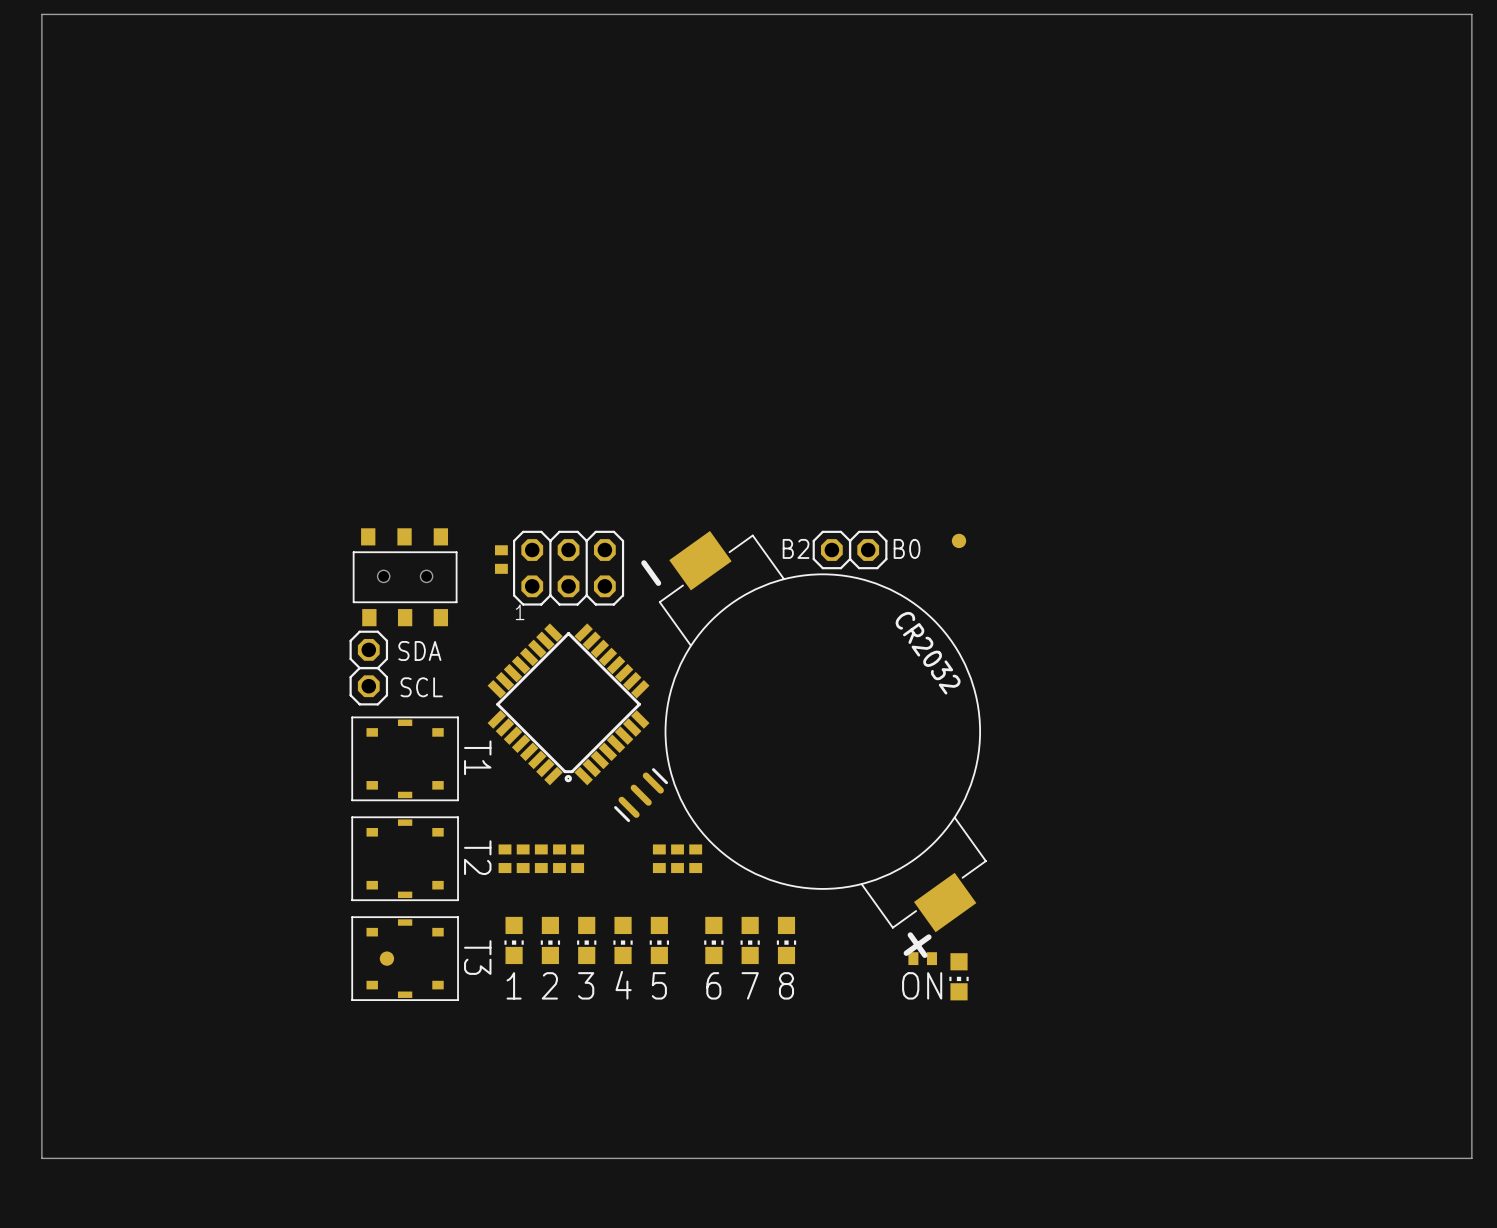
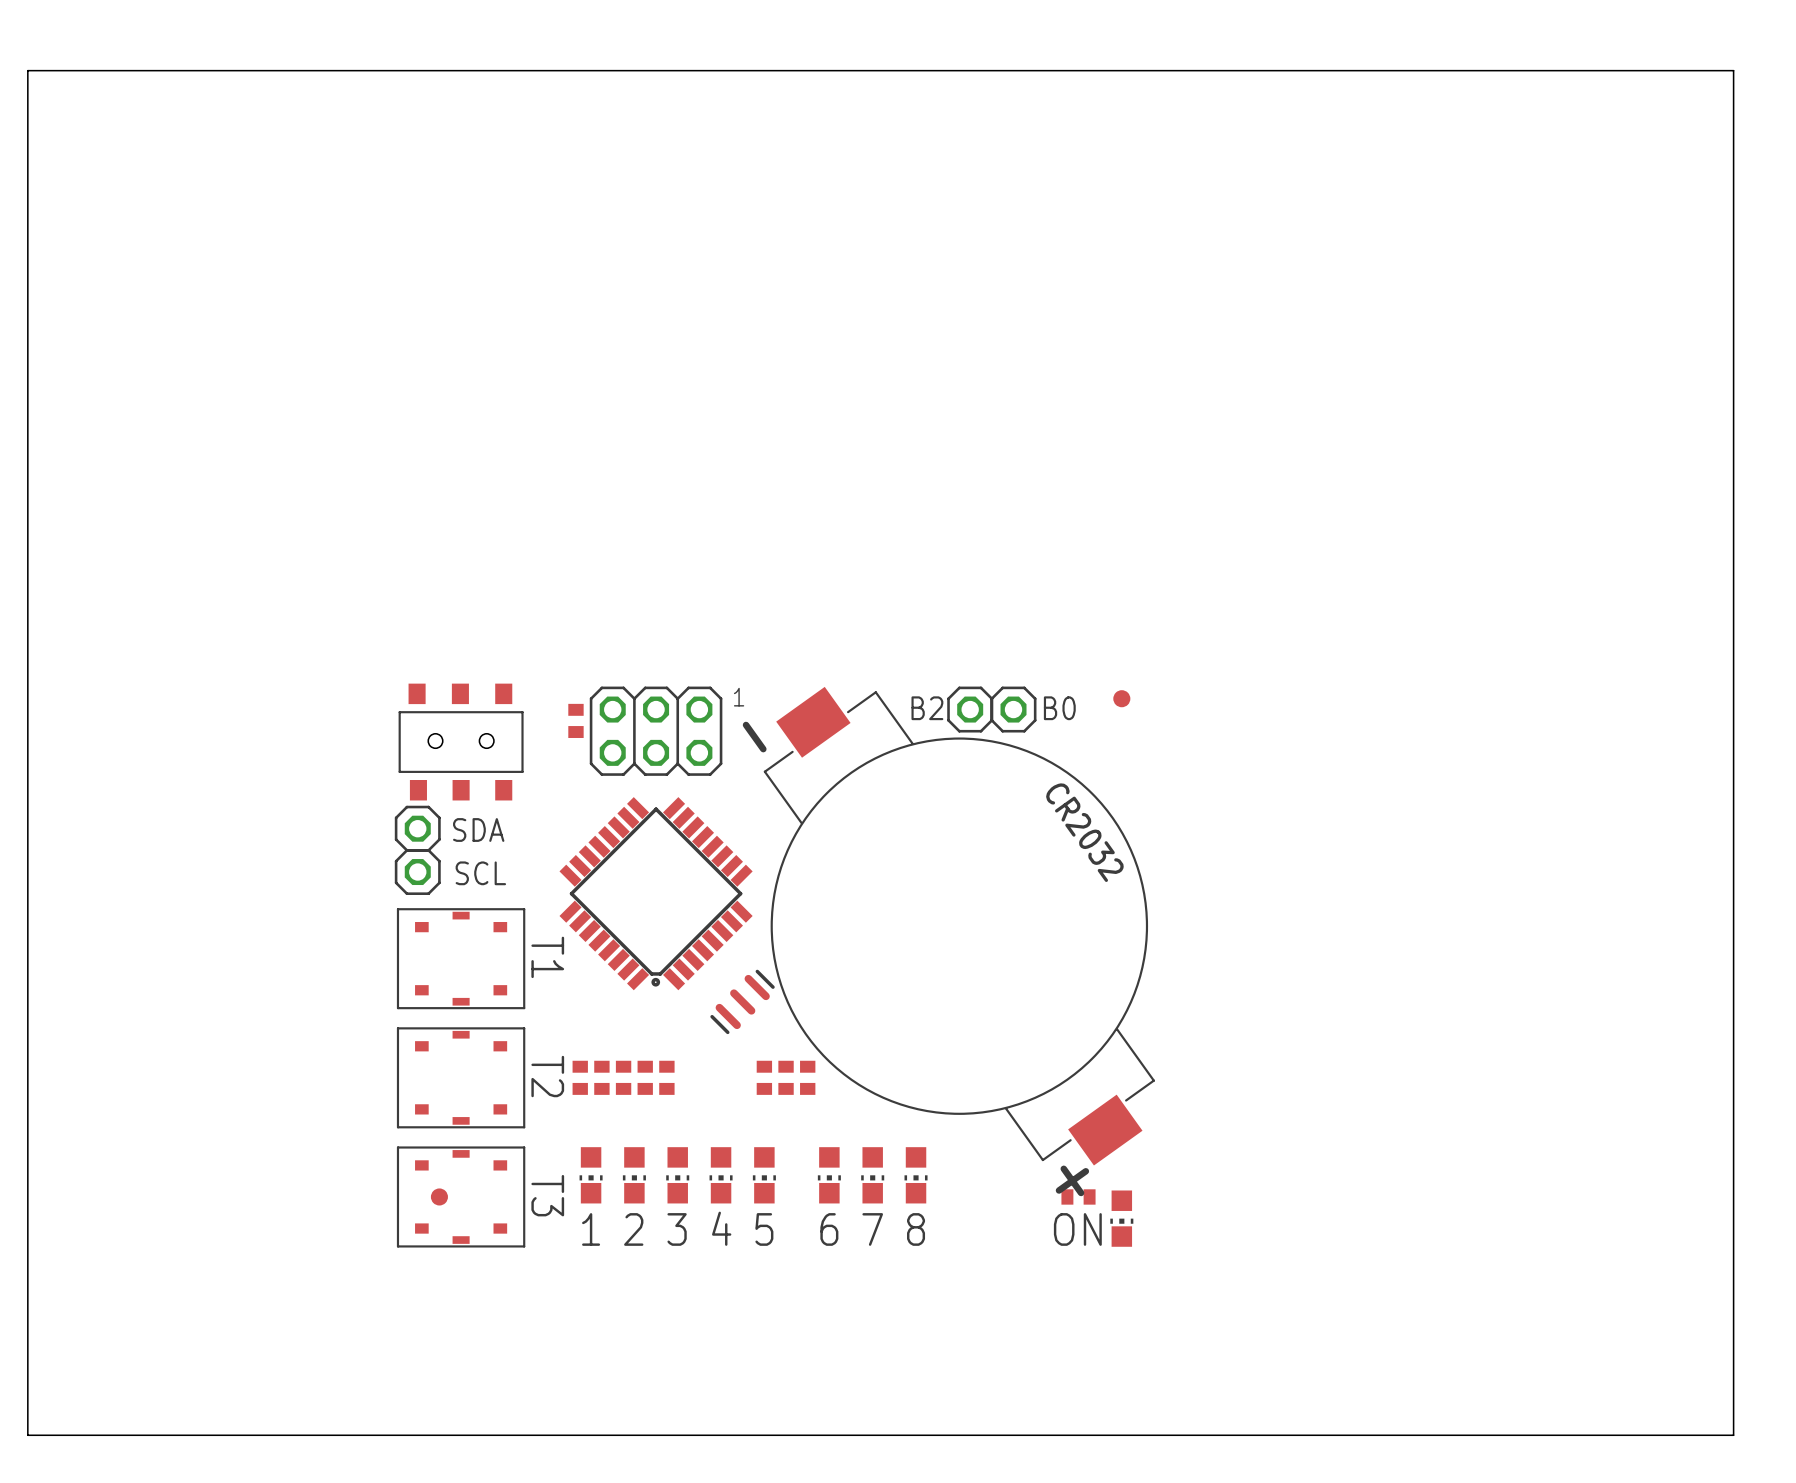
text position: 1 (520, 612) -> 1 (739, 697)

